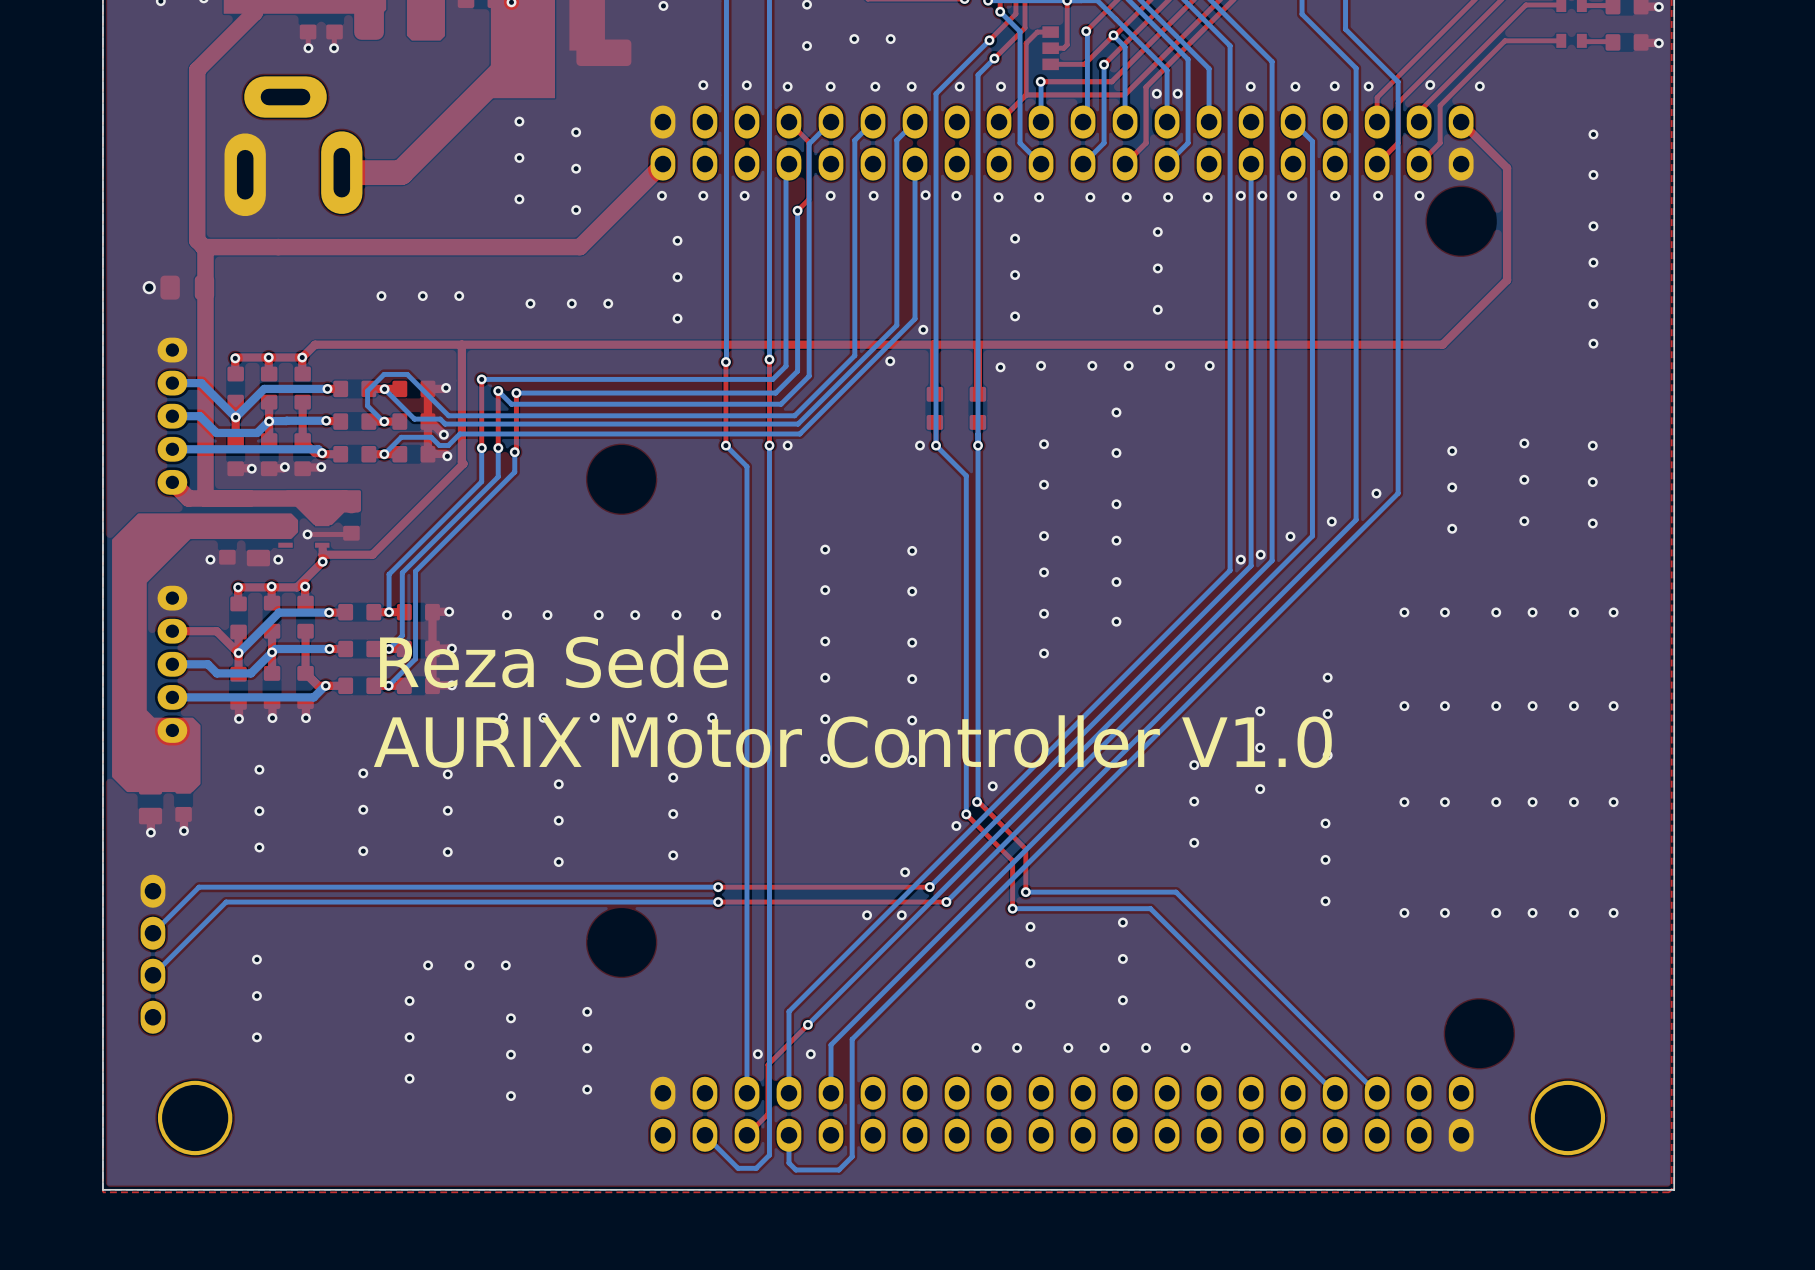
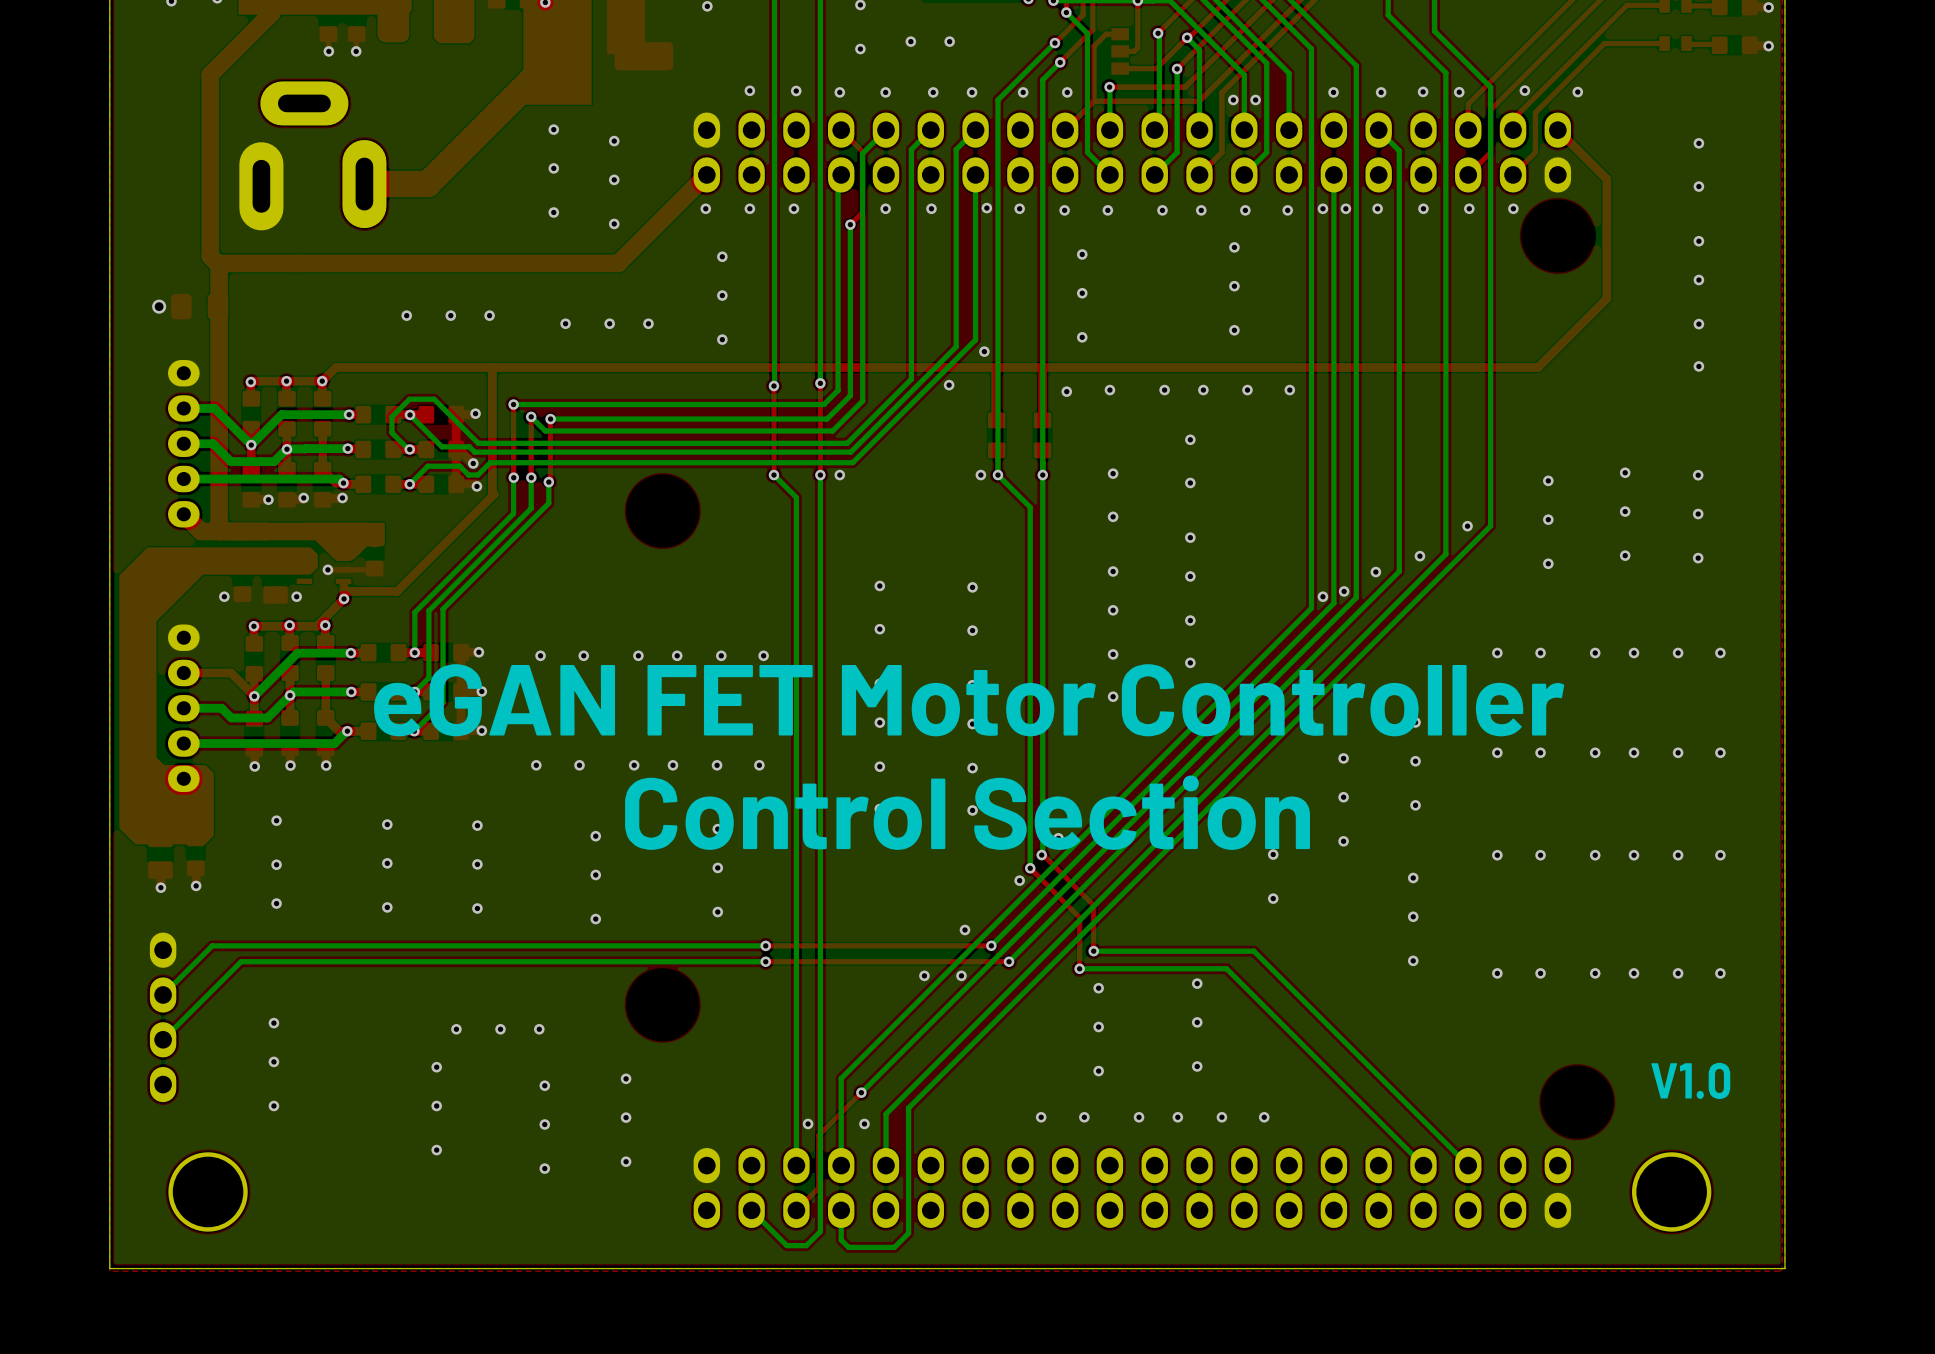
text: none -> eGAN FET Motor Controller (969, 700)
text: Reza Sede (554, 661) -> none
text: AURIX Motor Controller V1.0 (852, 741) -> none
text: none -> Control Section (967, 812)
text: none -> V1.0 (1690, 1080)

